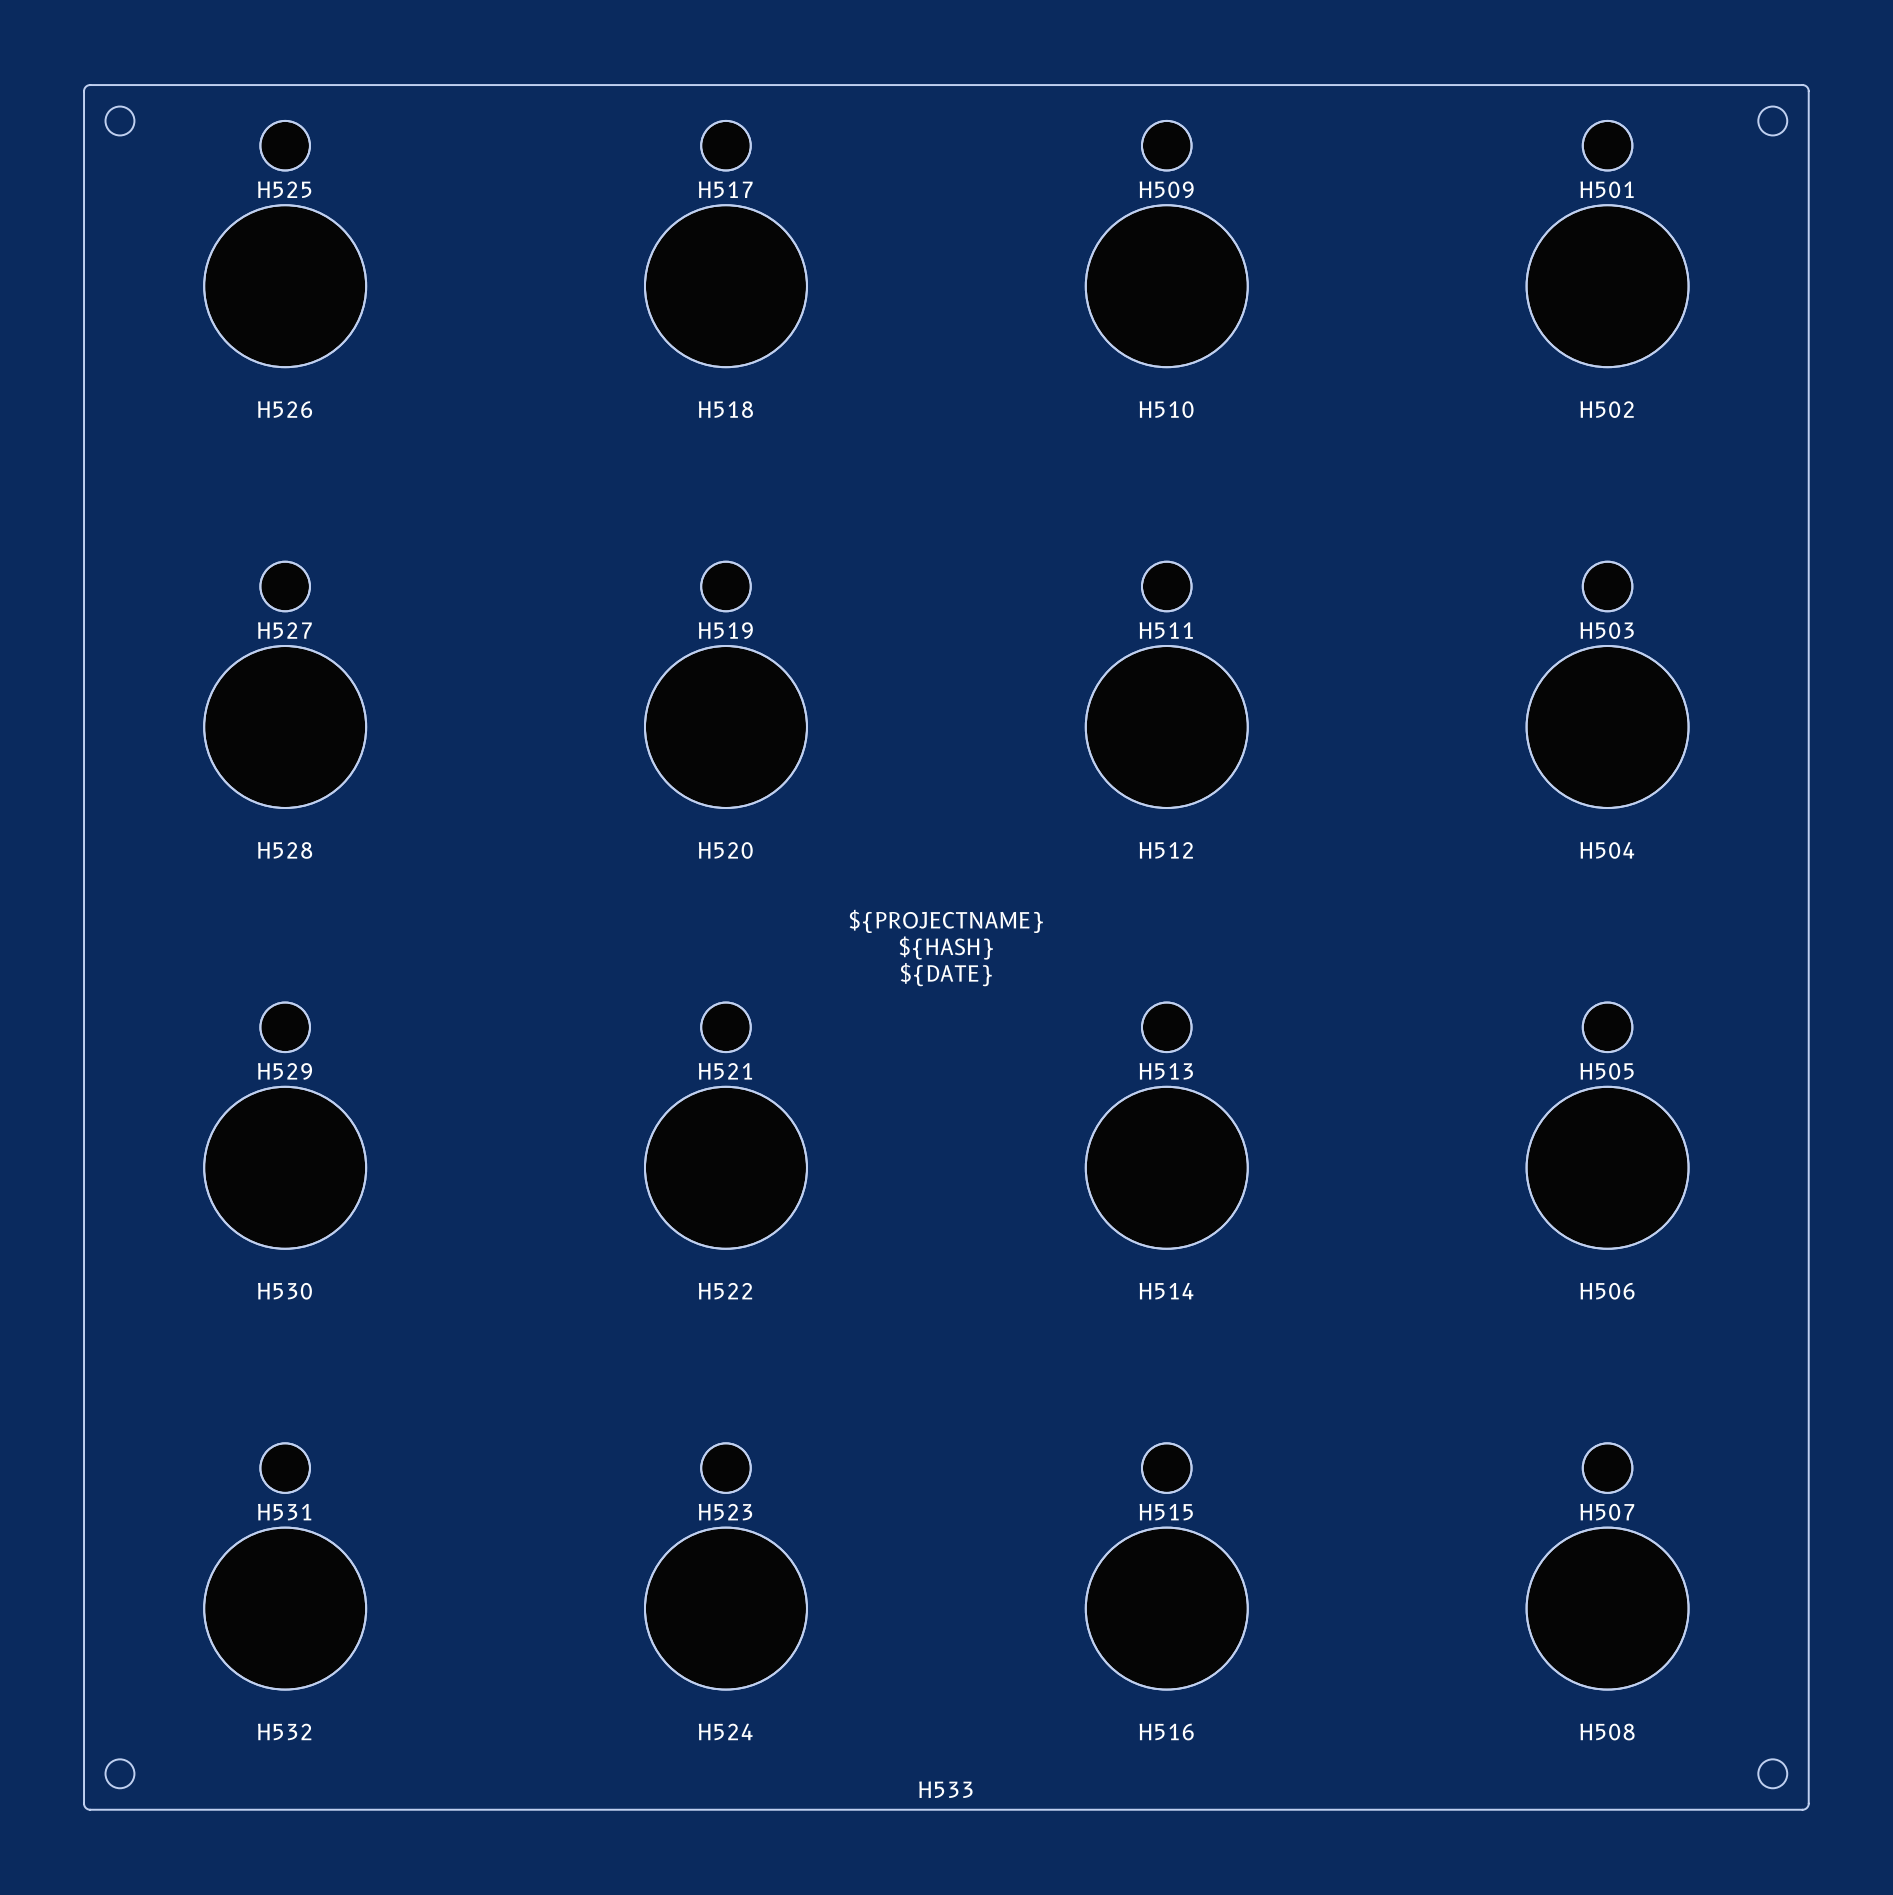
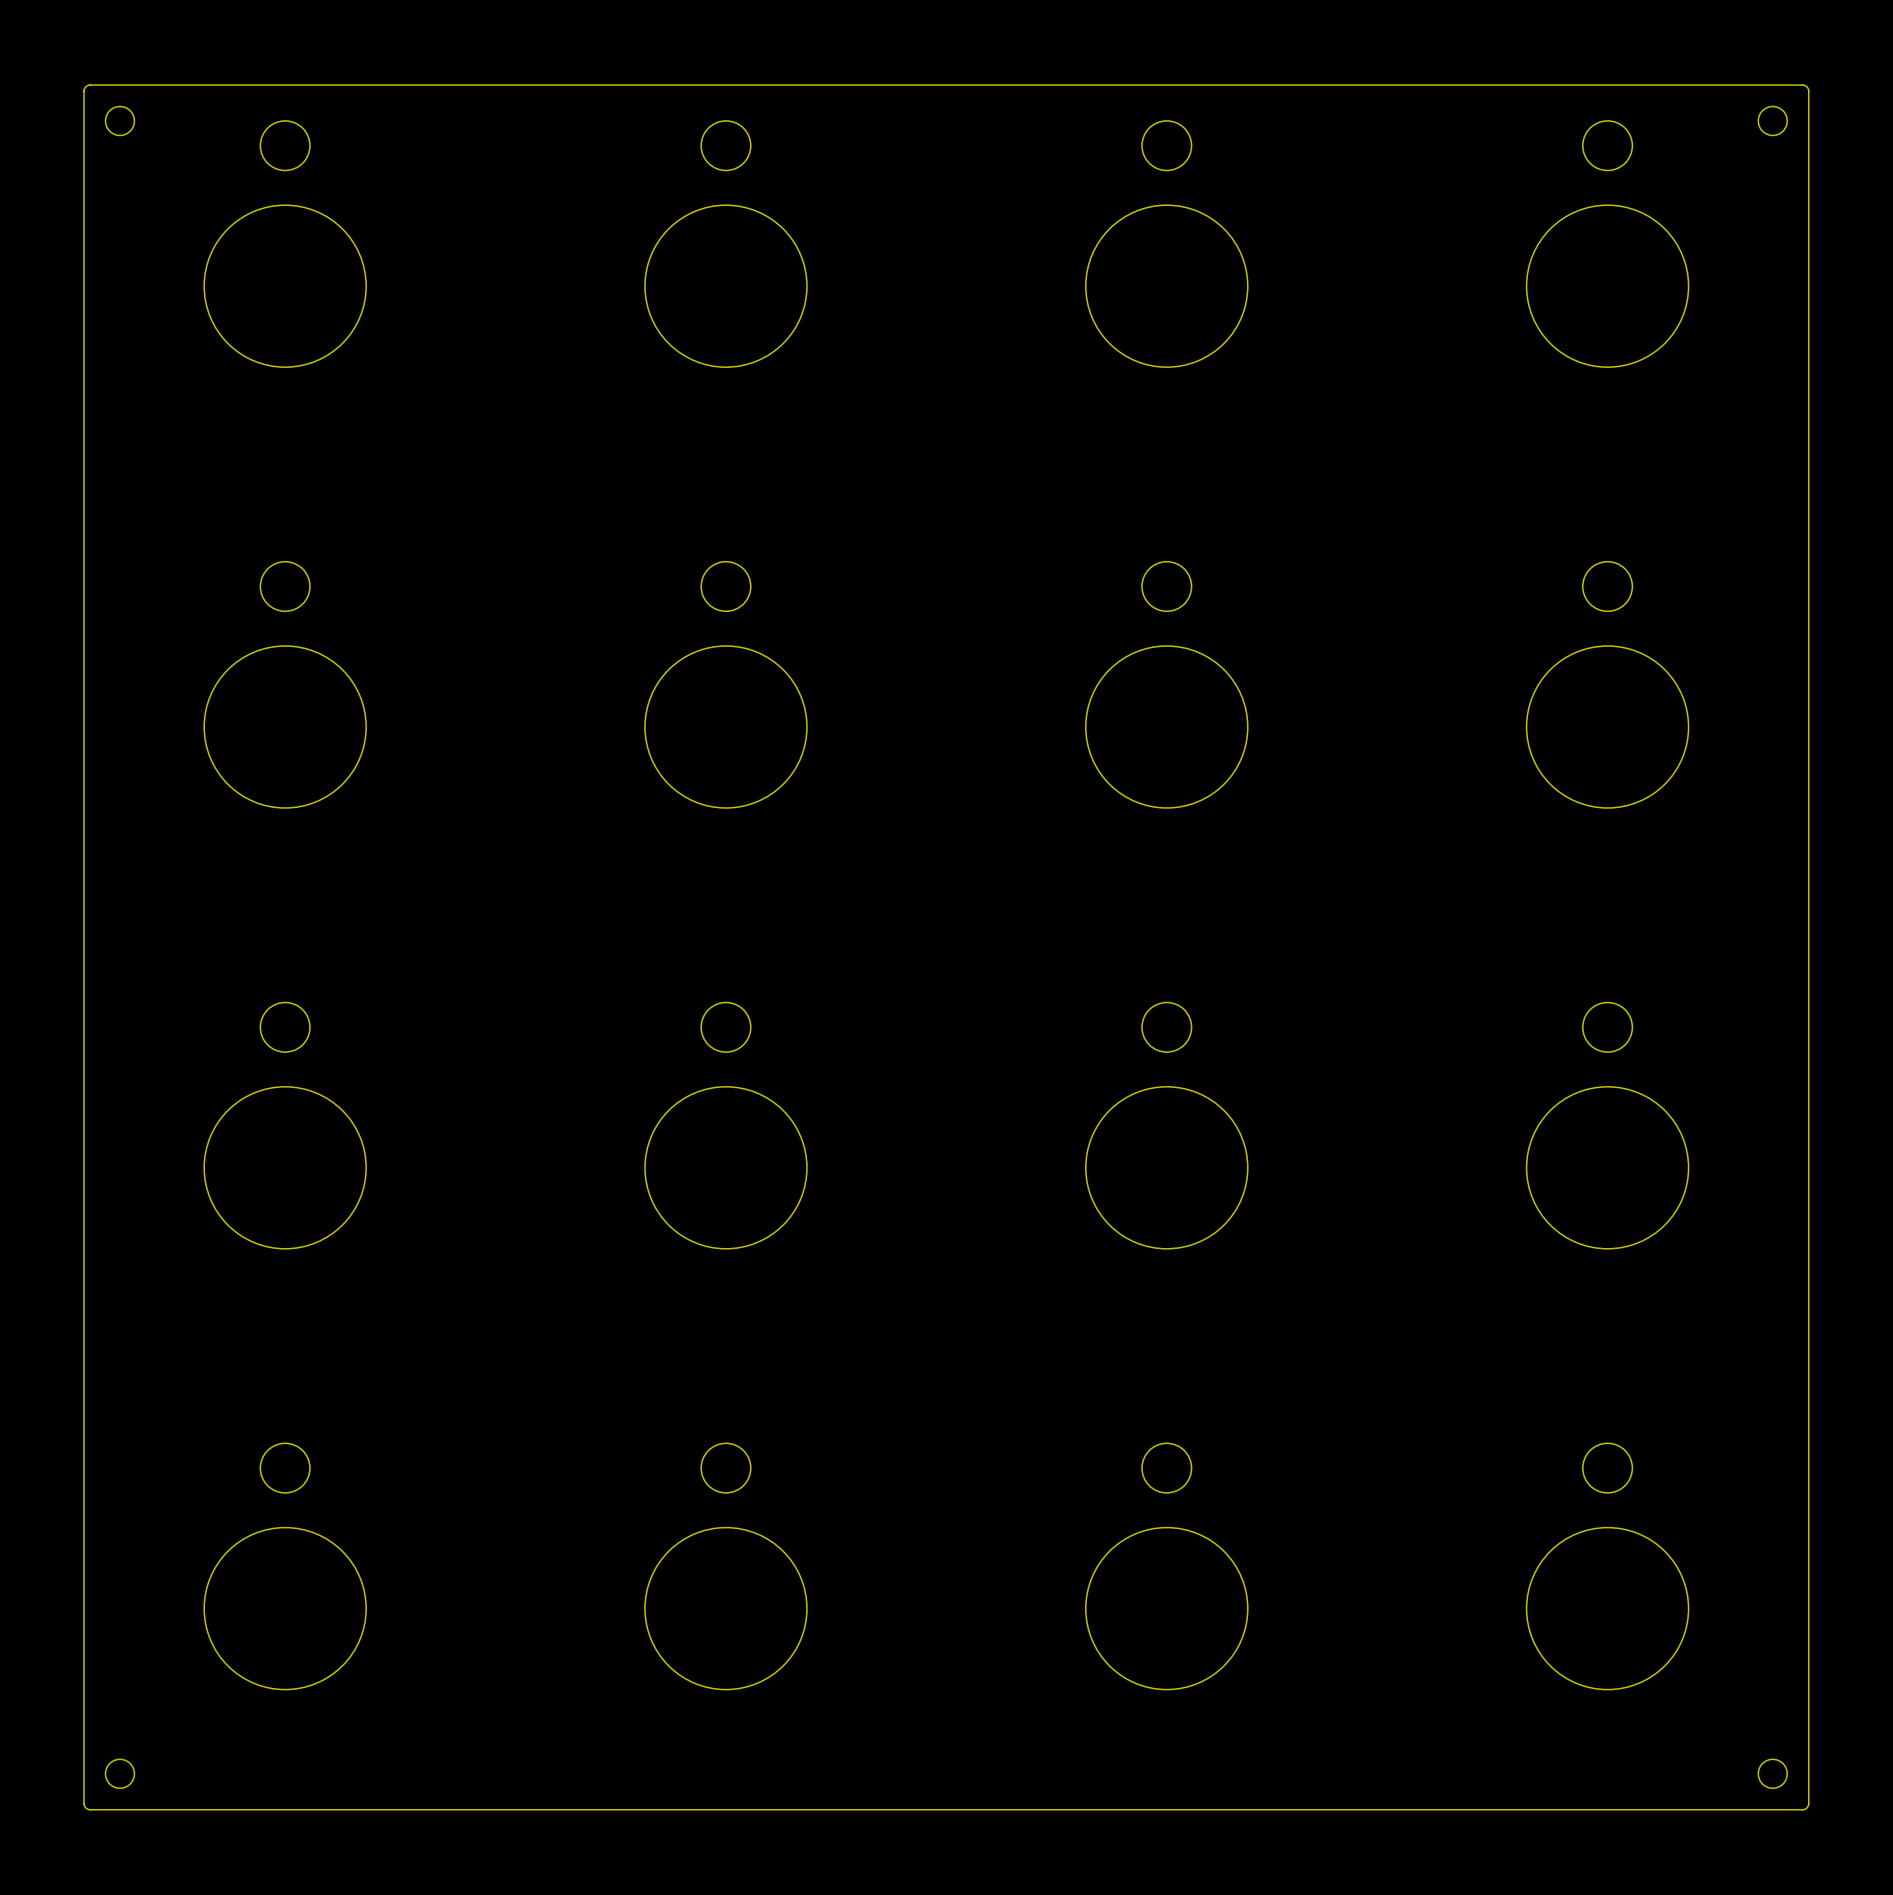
H525: (285, 145) -> none
H517: (725, 145) -> none
H509: (1166, 145) -> none
H501: (1607, 145) -> none
H526: (285, 286) -> none
H518: (725, 286) -> none
H510: (1166, 286) -> none
H502: (1607, 286) -> none
H527: (285, 586) -> none
H519: (725, 586) -> none
H511: (1166, 586) -> none
H503: (1607, 586) -> none
H528: (285, 726) -> none
H520: (725, 726) -> none
H512: (1166, 726) -> none
H504: (1607, 726) -> none
text: ${PROJECTNAME} (946, 921) -> none
H533: (946, 947) -> none
text: ${HASH} (946, 947) -> none
text: ${DATE} (946, 974) -> none
H529: (285, 1027) -> none
H521: (725, 1027) -> none
H513: (1166, 1027) -> none
H505: (1607, 1027) -> none
H530: (285, 1167) -> none
H522: (725, 1167) -> none
H514: (1166, 1167) -> none
H506: (1607, 1167) -> none
H531: (285, 1468) -> none
H523: (725, 1468) -> none
H515: (1166, 1468) -> none
H507: (1607, 1468) -> none
H532: (285, 1608) -> none
H524: (725, 1608) -> none
H516: (1166, 1608) -> none
H508: (1607, 1608) -> none

